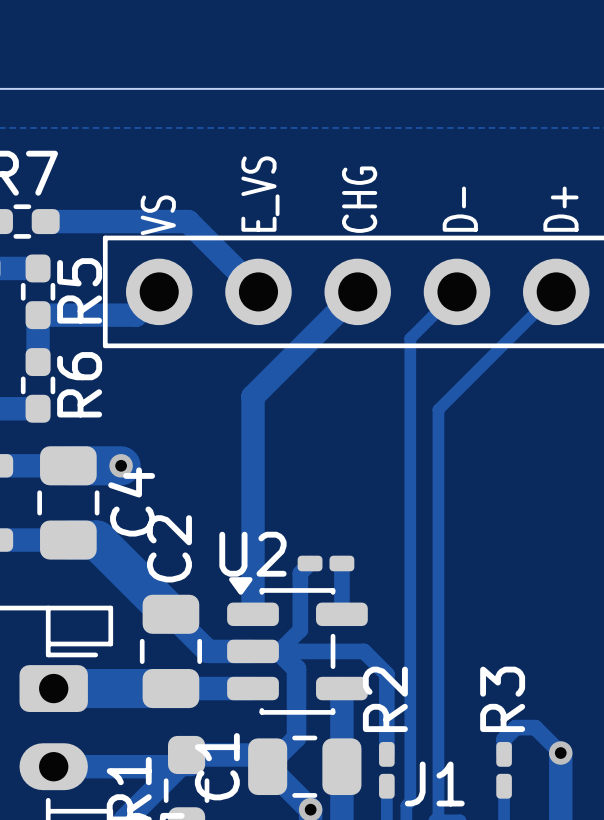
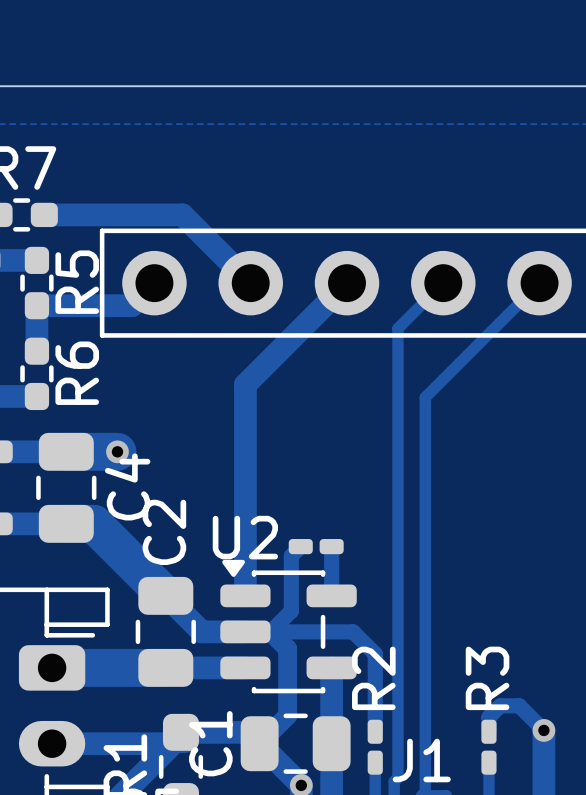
text: E_VS (260, 194) -> none
text: CHG (359, 199) -> none
text: D- (460, 209) -> none
text: D+ (560, 209) -> none
text: VS (158, 215) -> none

